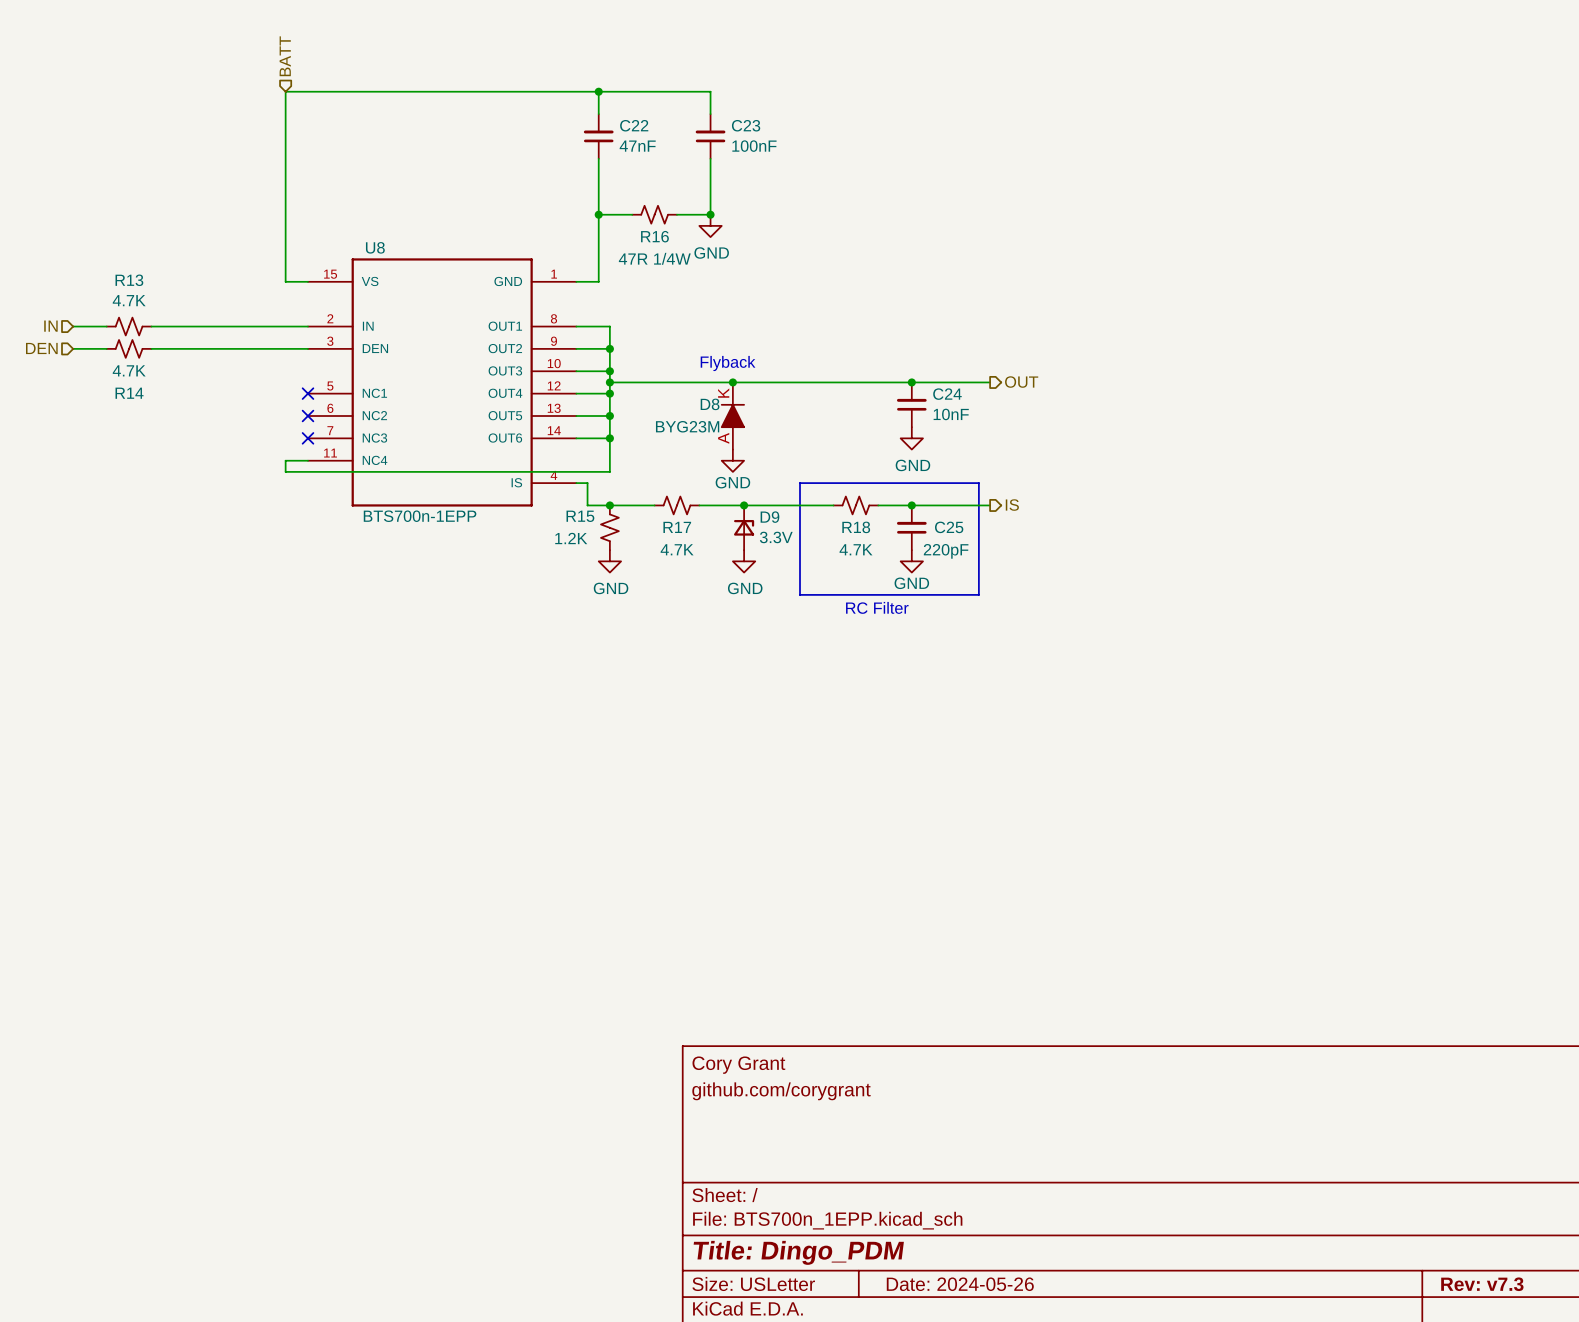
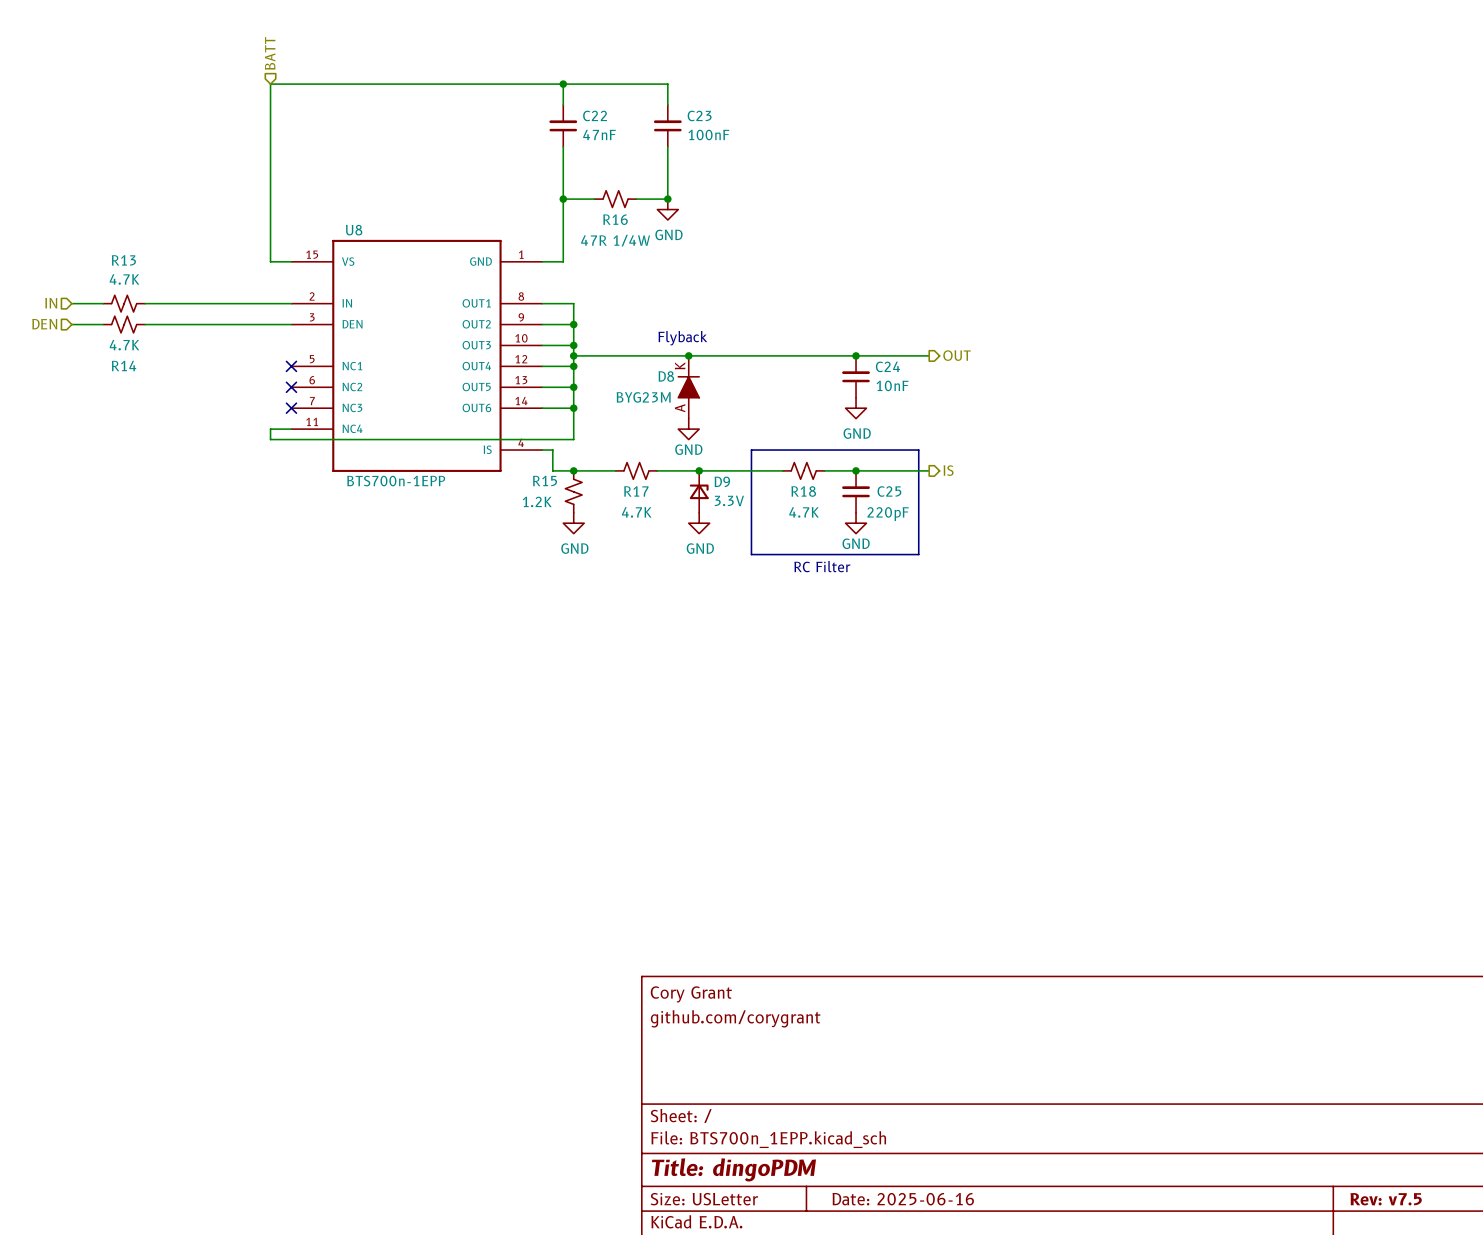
title block: Title: Dingo_PDM (798, 1252) -> Title: dingoPDM (733, 1169)
title block: Date: 2024-05-26 (960, 1284) -> Date: 2025-06-16 (903, 1199)
title block: Rev: v7.3 (1482, 1284) -> Rev: v7.5 (1386, 1199)

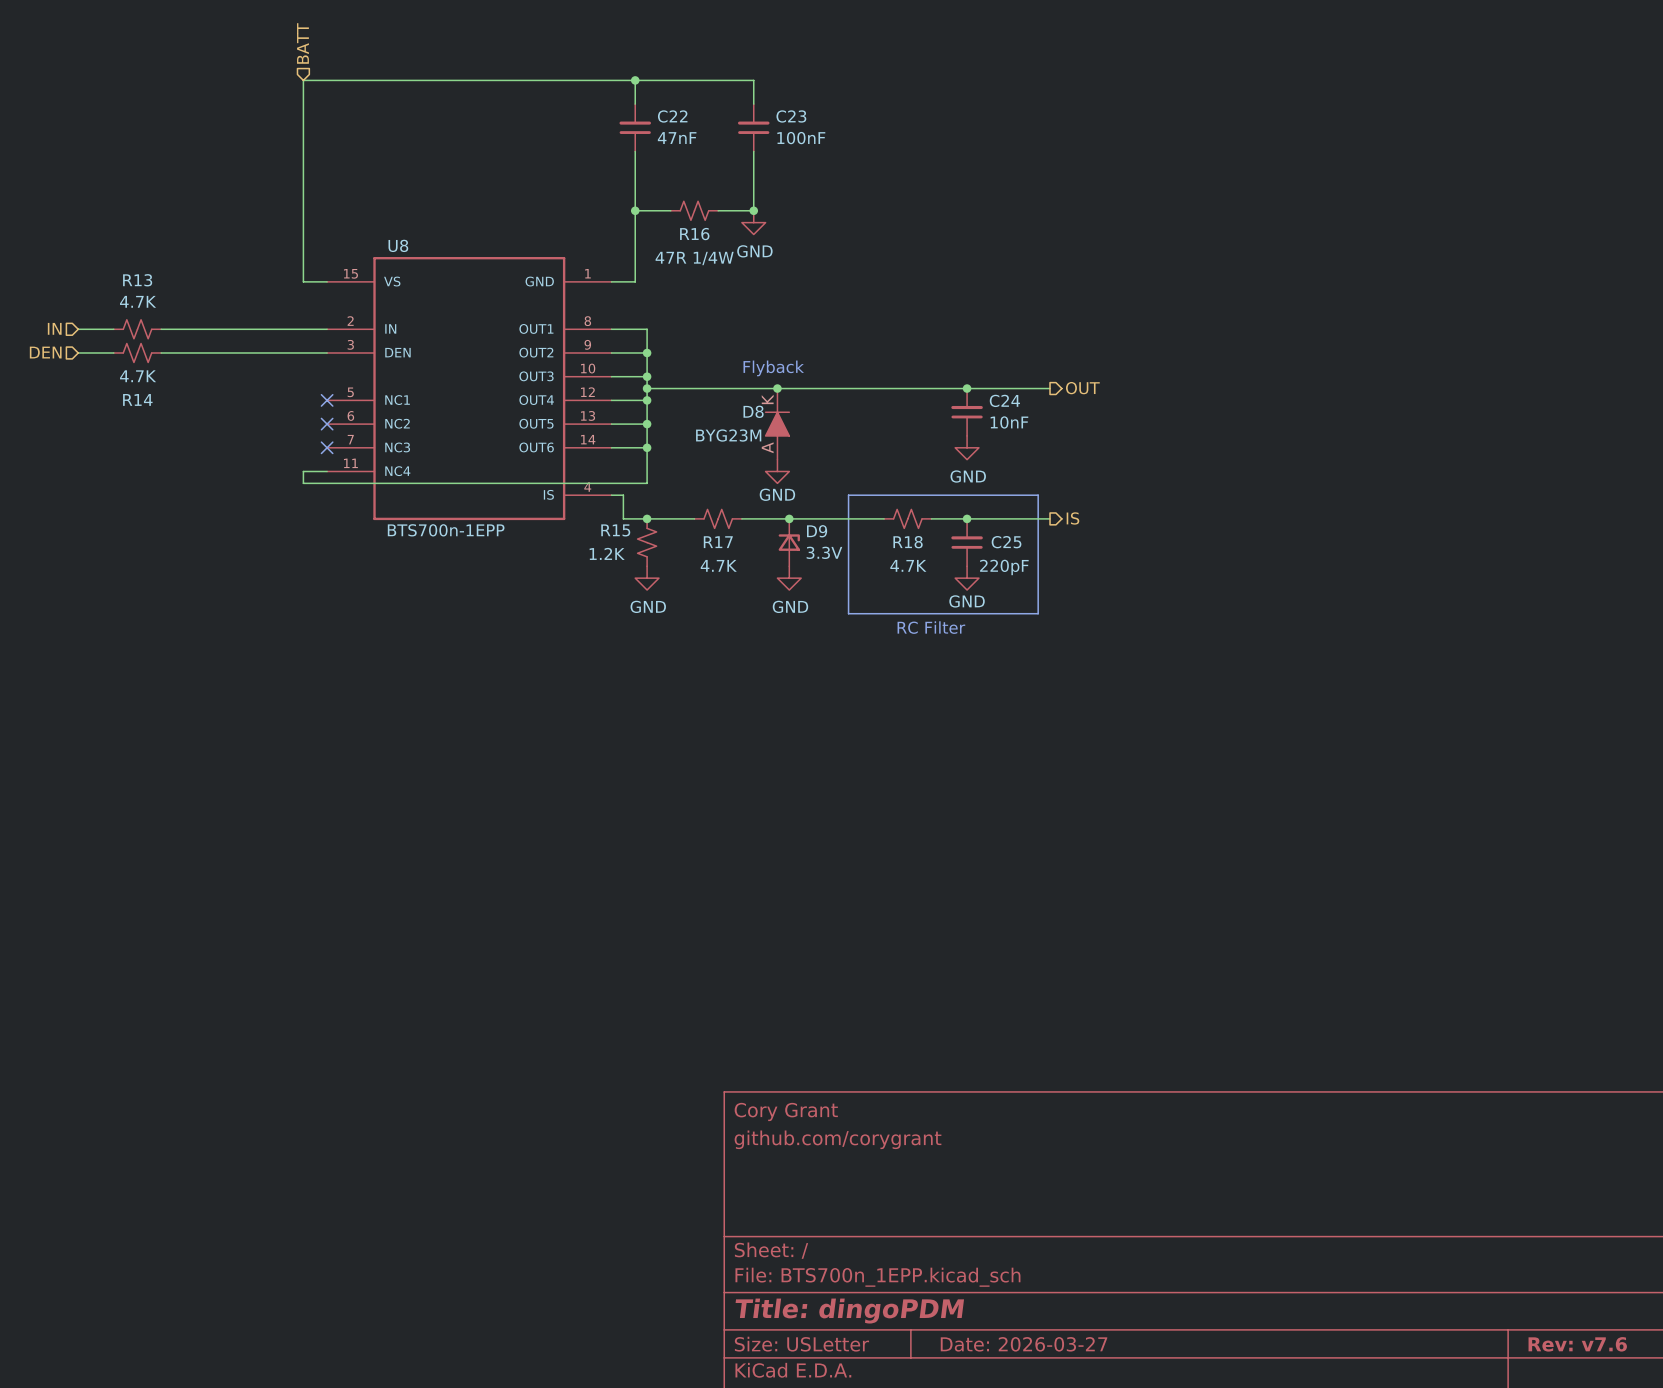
title block: Date: 2025-06-16 (903, 1199) -> Date: 2026-03-27 (1024, 1344)
title block: Rev: v7.5 (1386, 1199) -> Rev: v7.6 (1577, 1344)

